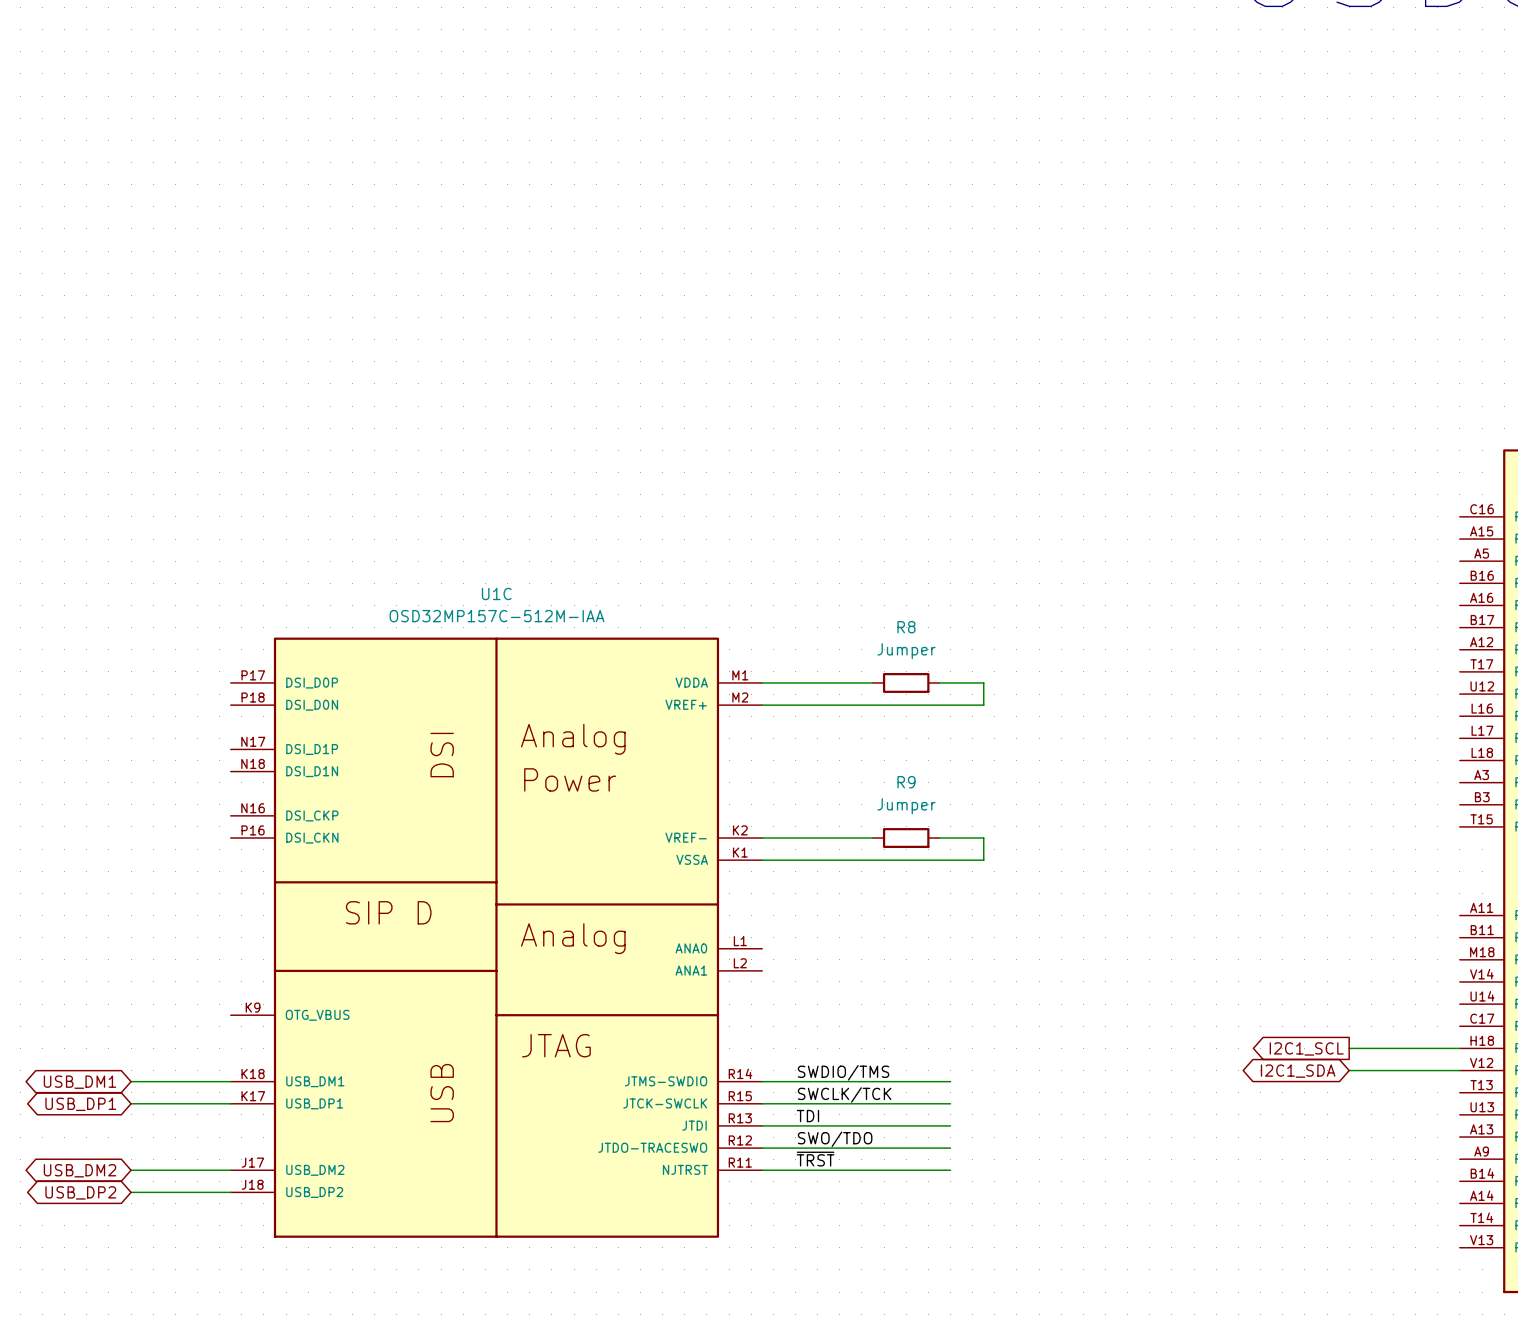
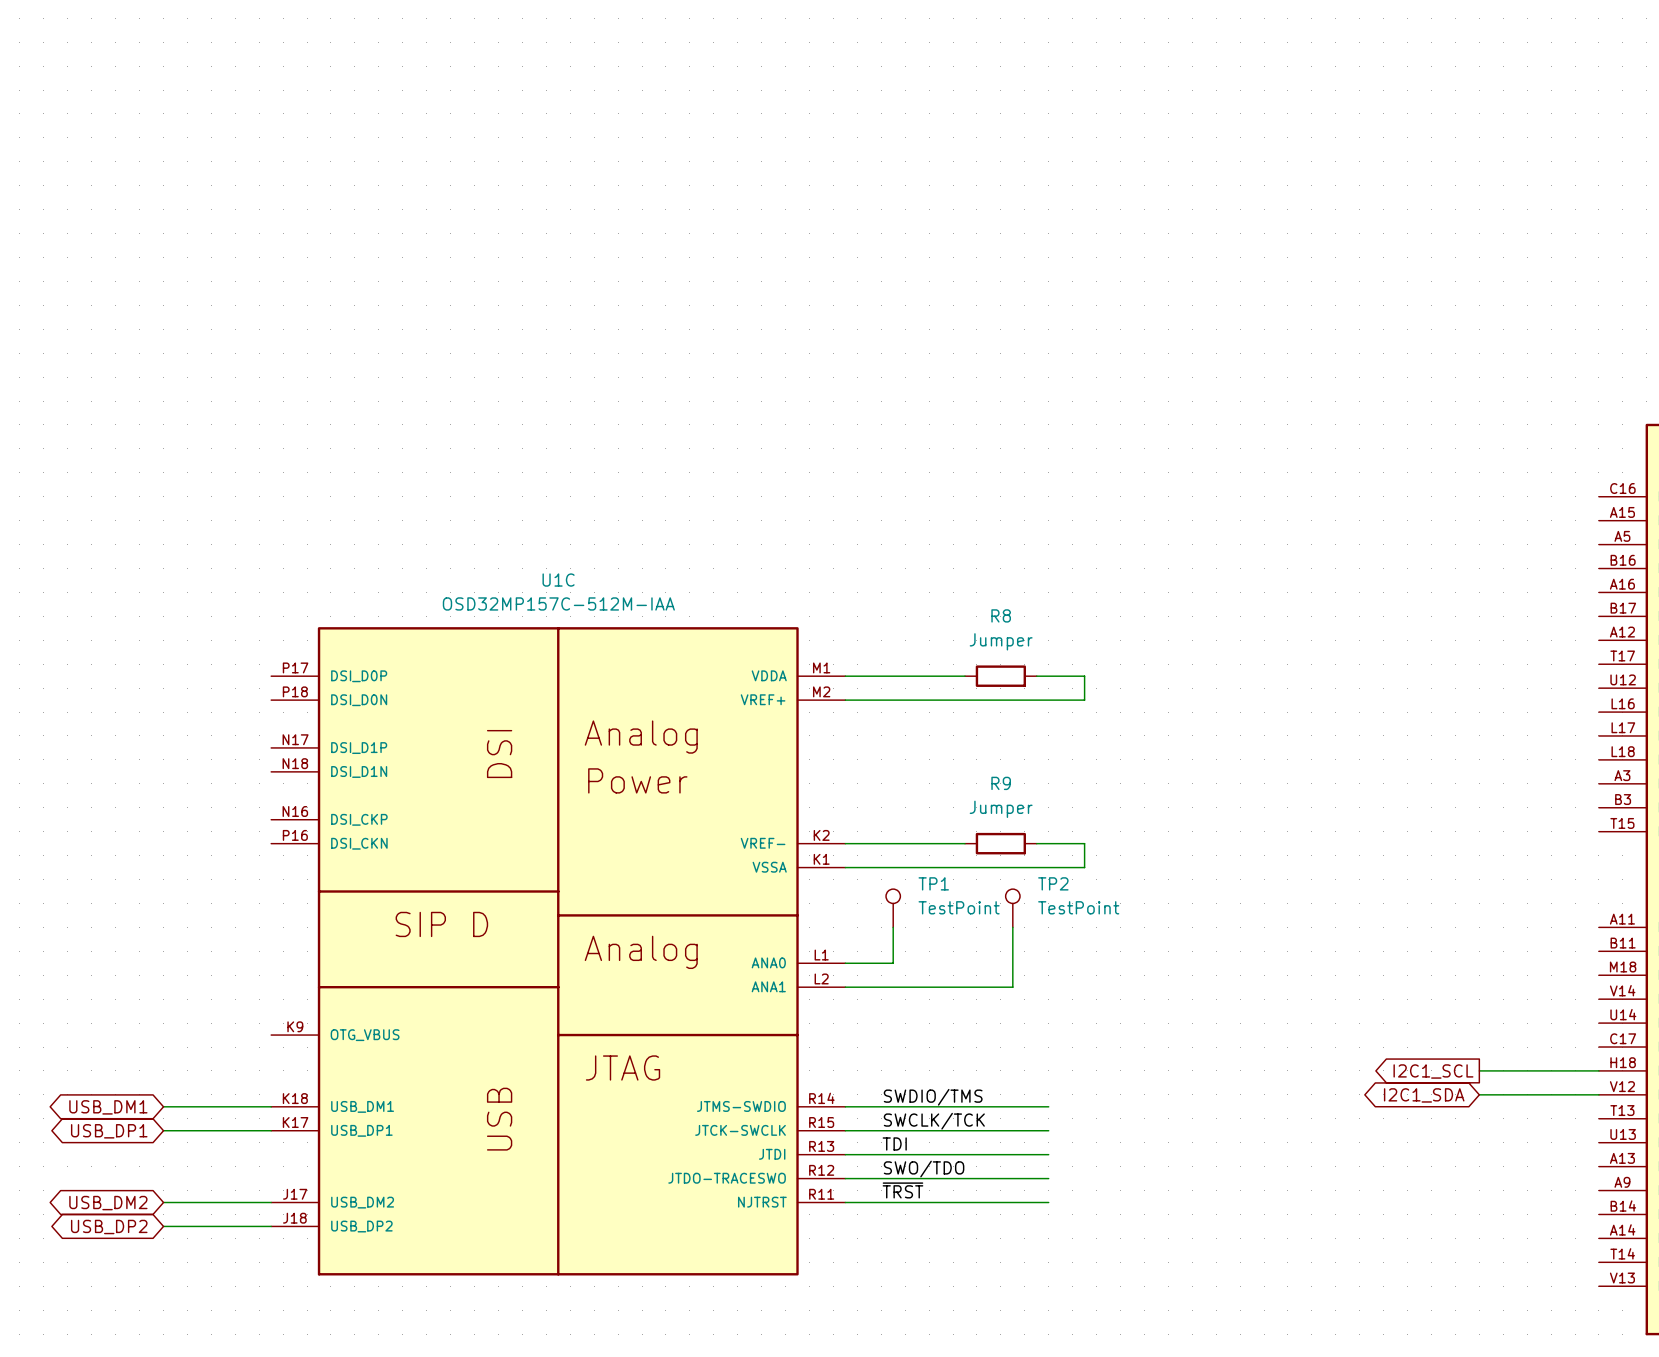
TP1: none -> TestPoint (893, 908)
TP2: none -> TestPoint (1012, 908)
wire: none -> (893, 927) (893, 963) (845, 963)
wire: none -> (1012, 927) (1012, 987) (845, 987)

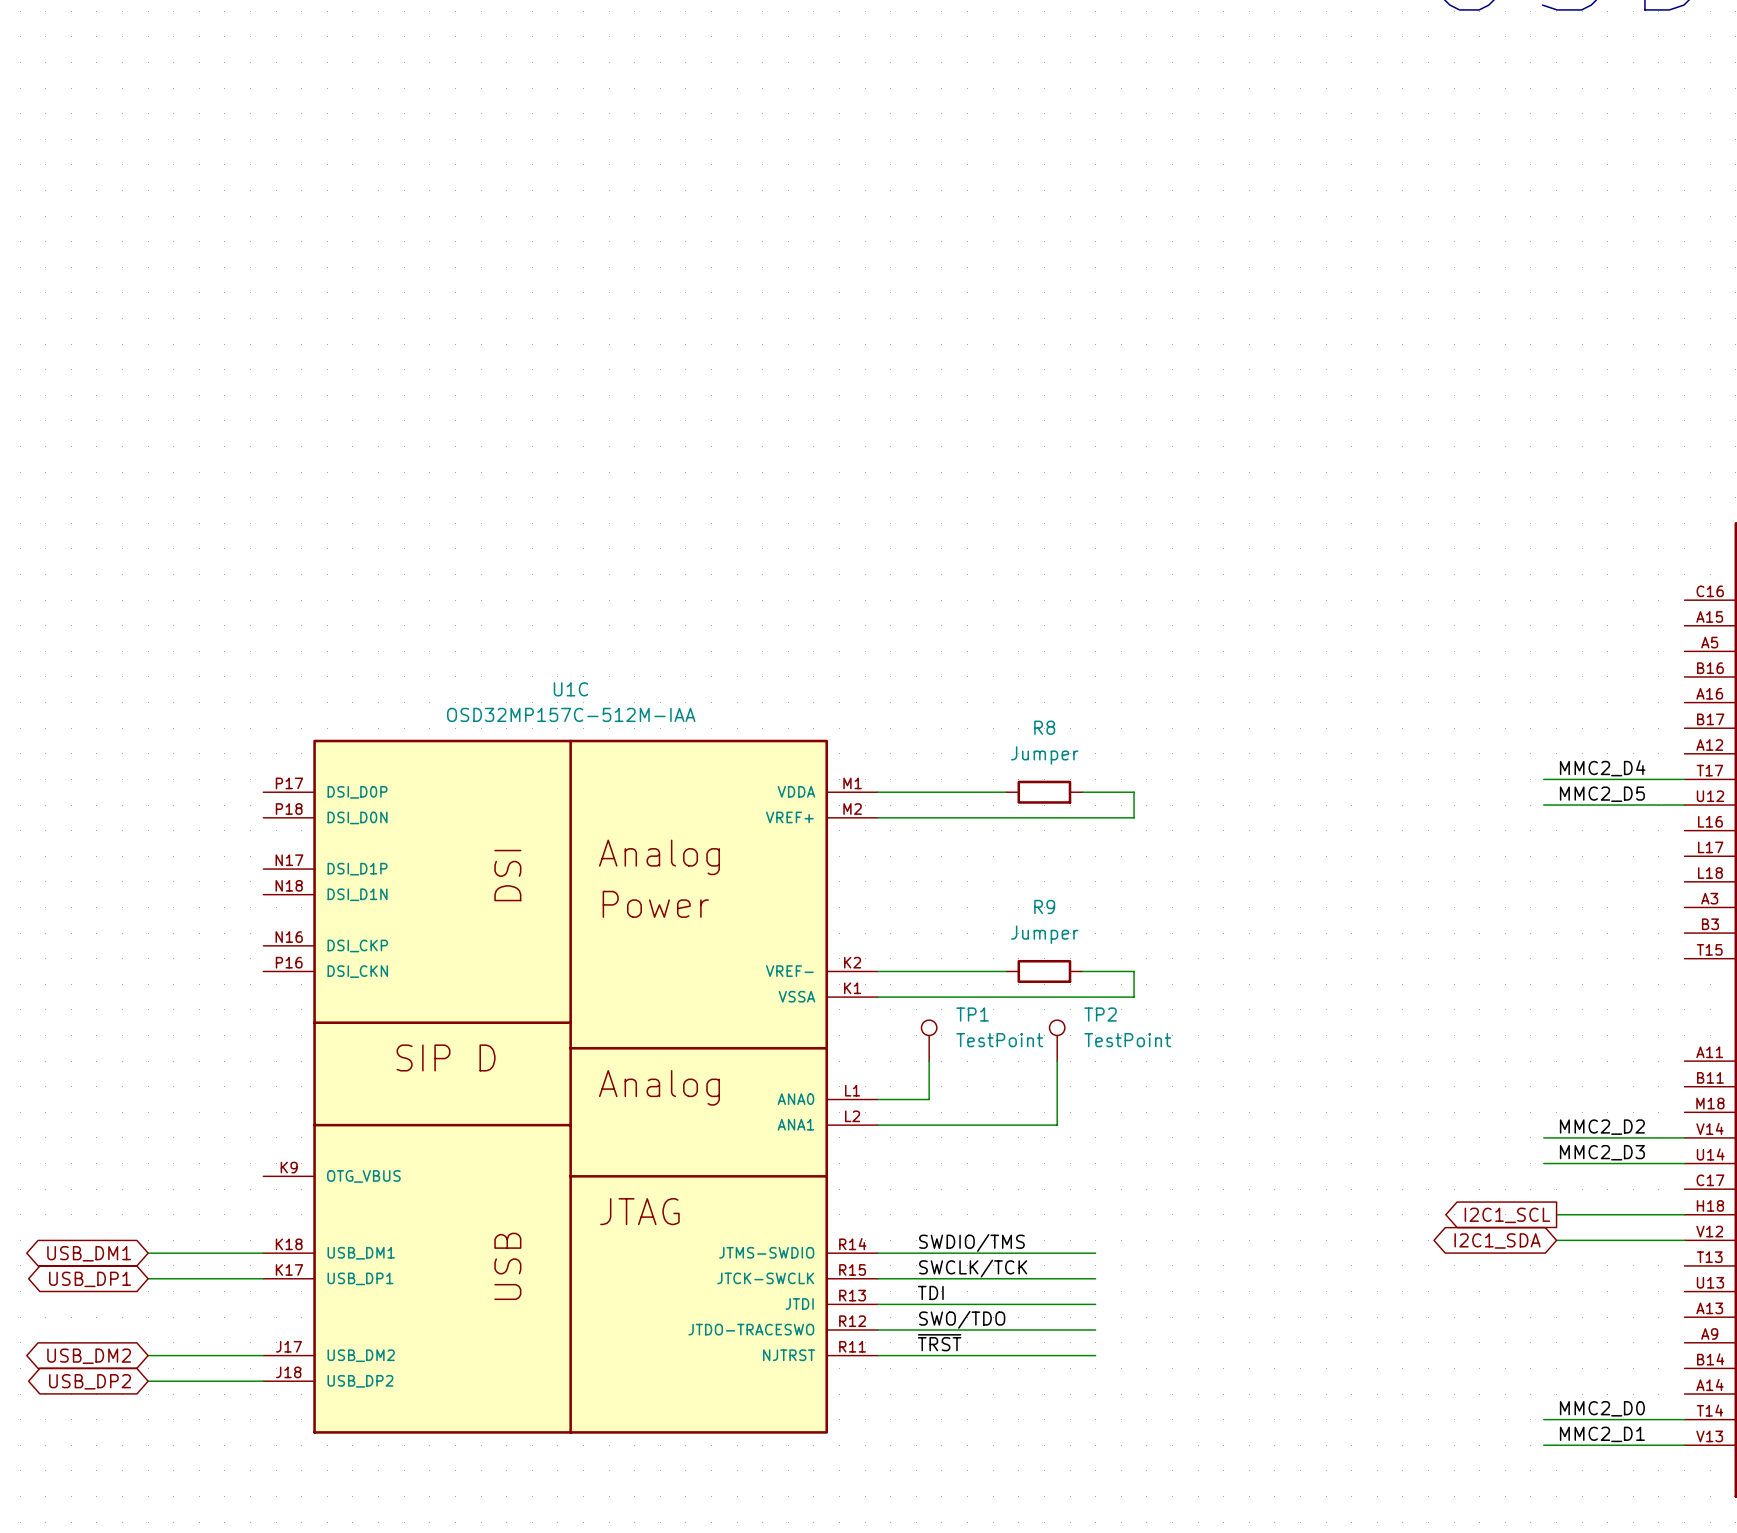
label: none -> MMC2_D4 (1602, 768)
wire: none -> (1543, 779) (1684, 779)
label: none -> MMC2_D5 (1602, 794)
wire: none -> (1543, 805) (1684, 805)
label: none -> MMC2_D2 (1602, 1127)
wire: none -> (1543, 1137) (1684, 1137)
label: none -> MMC2_D3 (1602, 1152)
wire: none -> (1543, 1163) (1684, 1163)
label: none -> MMC2_D0 (1602, 1408)
wire: none -> (1543, 1419) (1684, 1419)
label: none -> MMC2_D1 (1602, 1434)
wire: none -> (1543, 1445) (1684, 1445)

